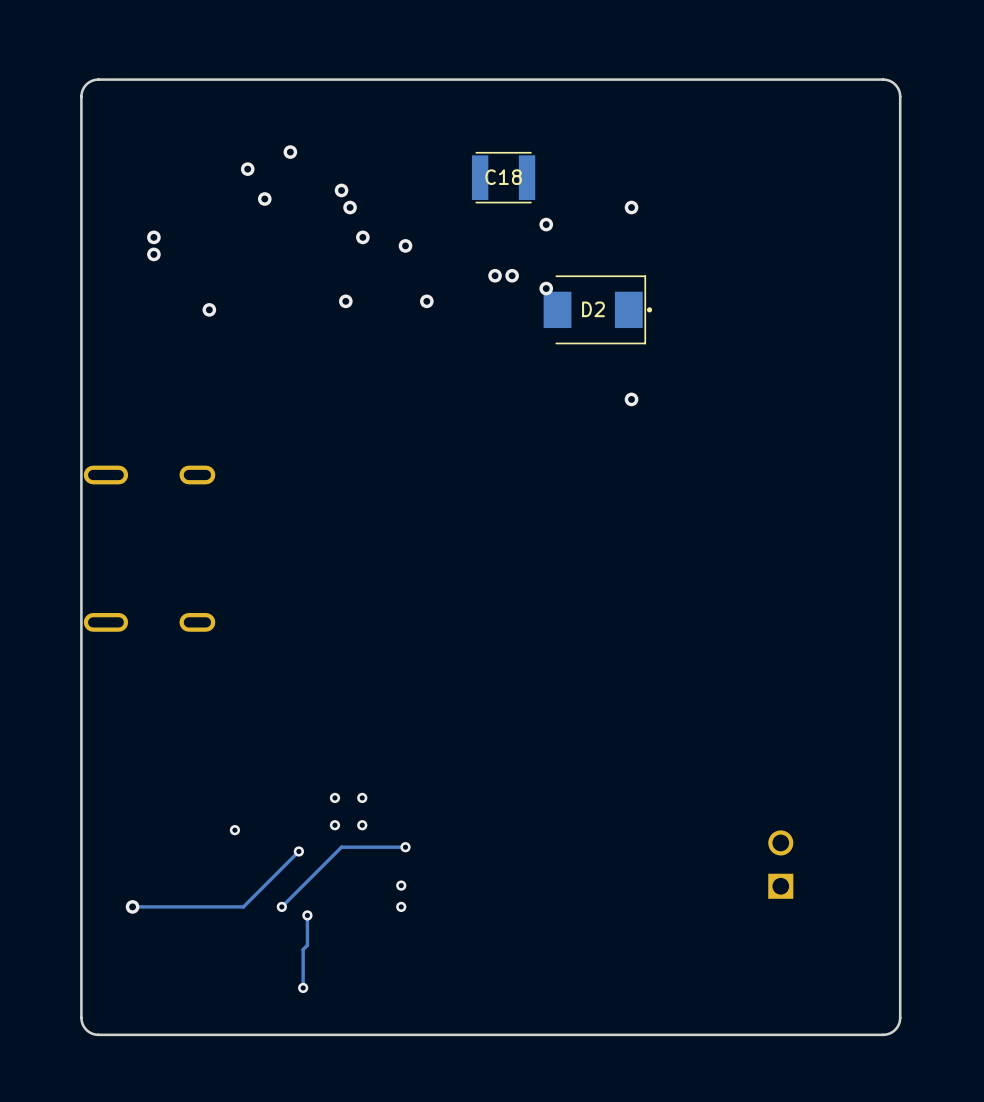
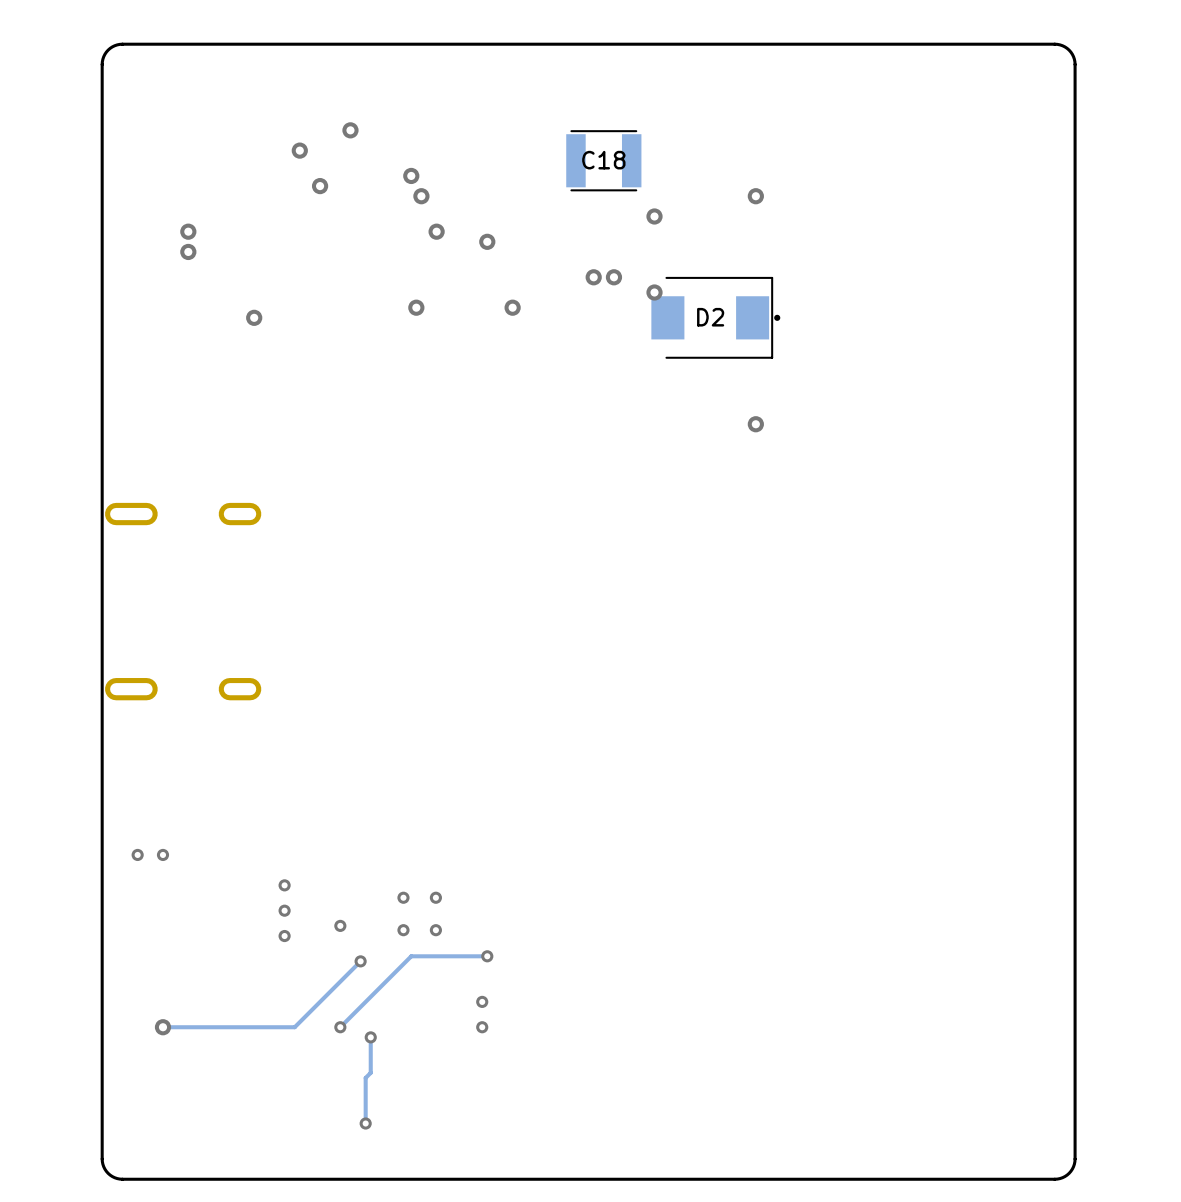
via: none -> (137, 854)
via: none -> (162, 854)
via: none -> (284, 885)
via: none -> (284, 910)
via: none -> (340, 925)
part: (780, 864) -> none

